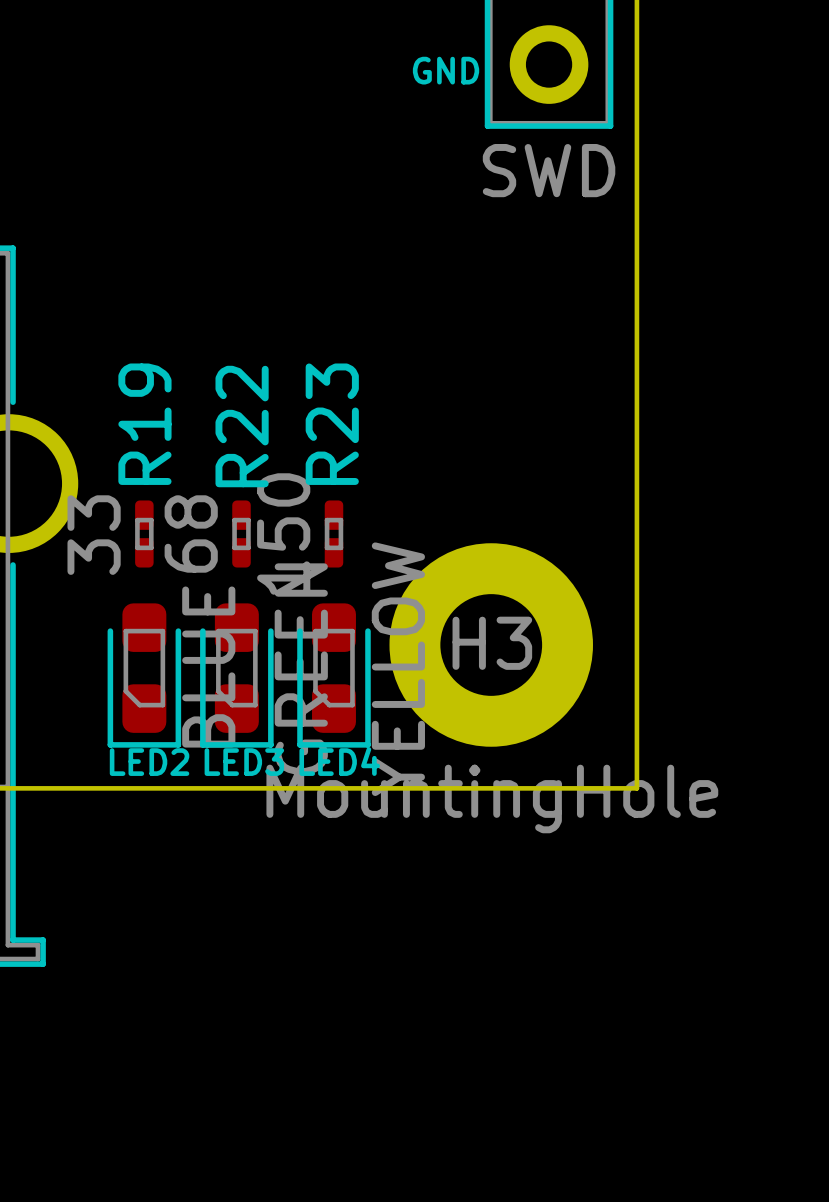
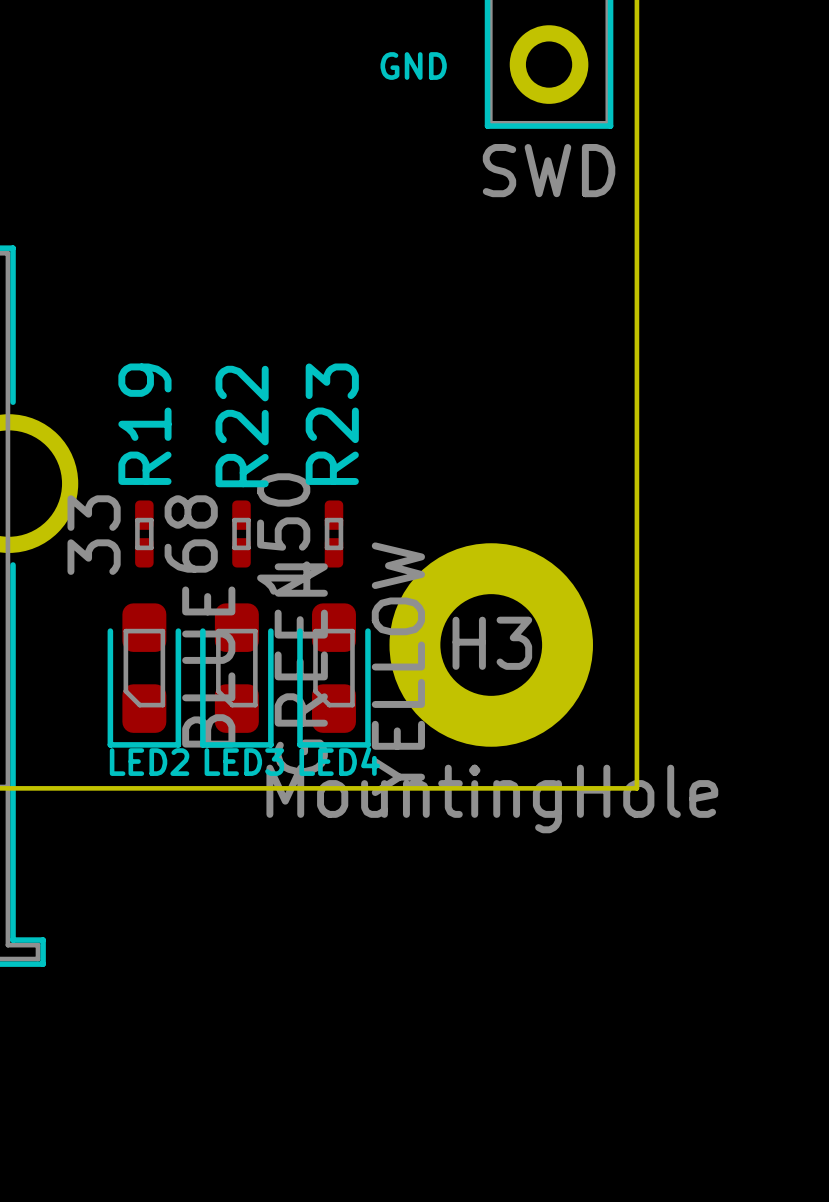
text position: GND (446, 70) -> GND (413, 66)

